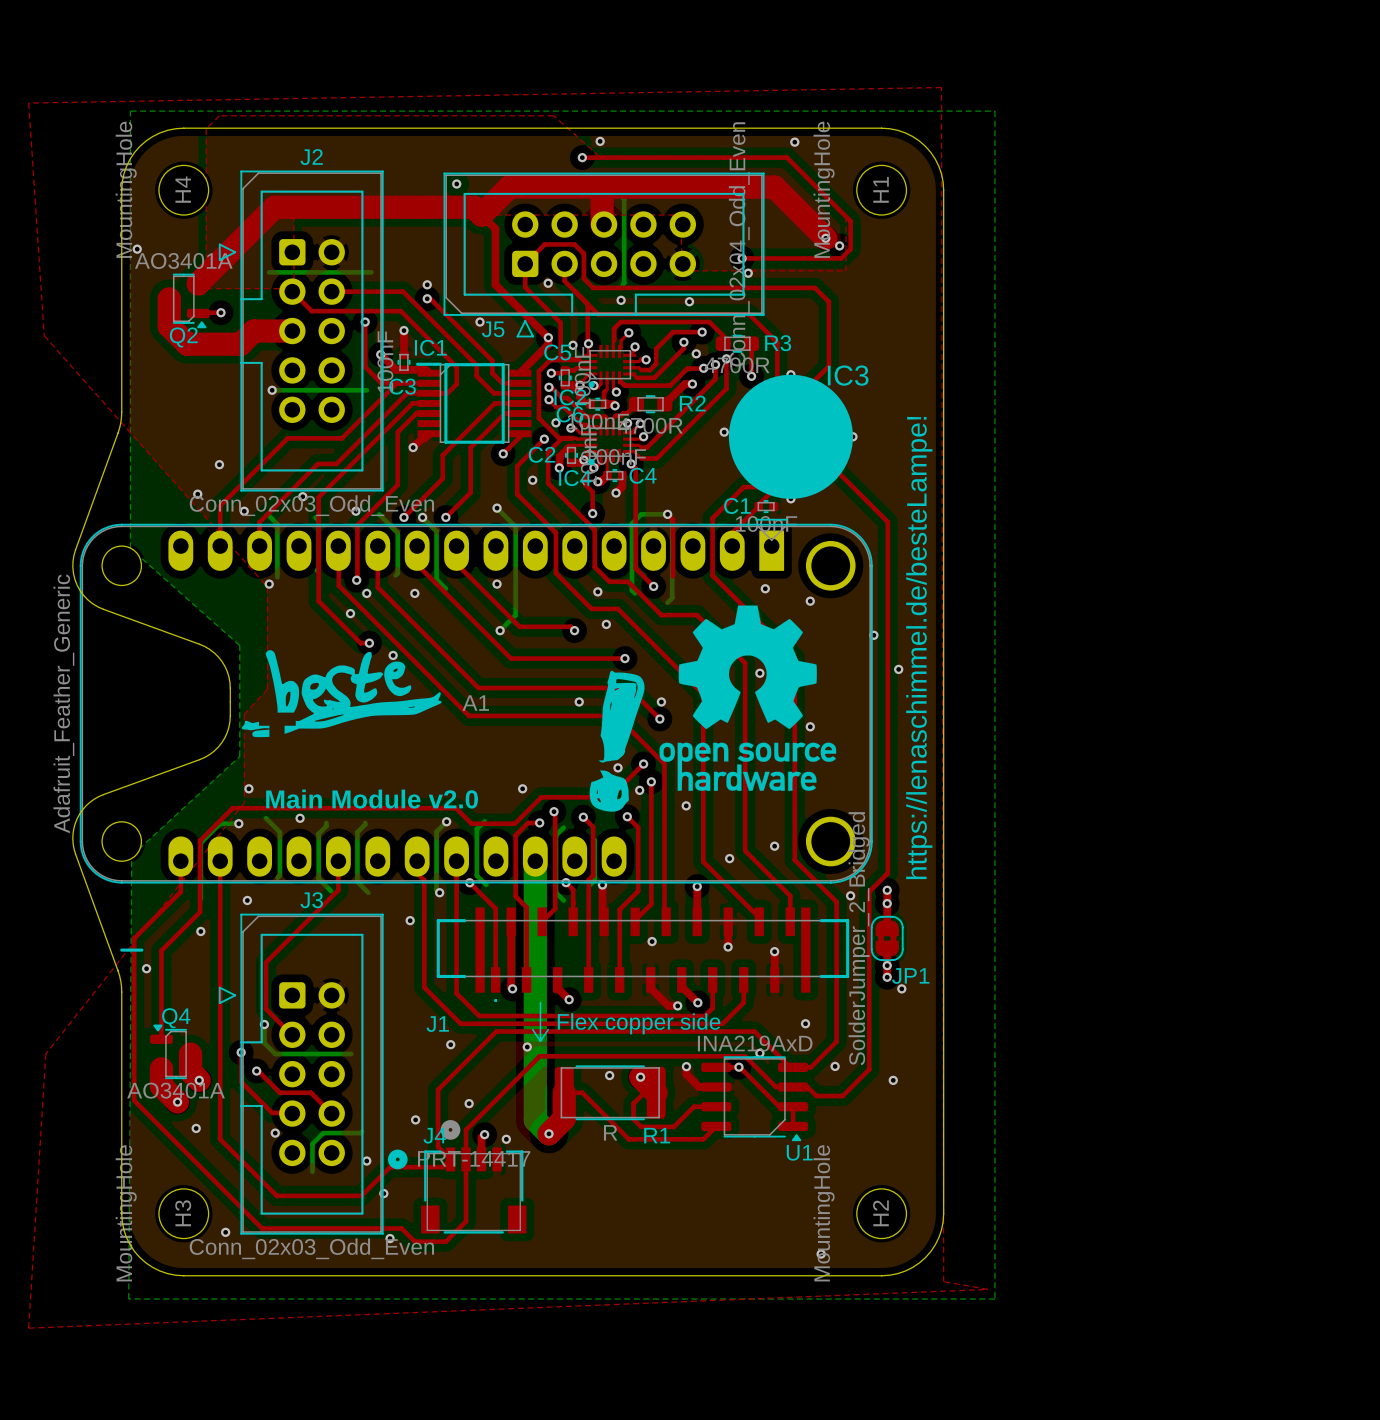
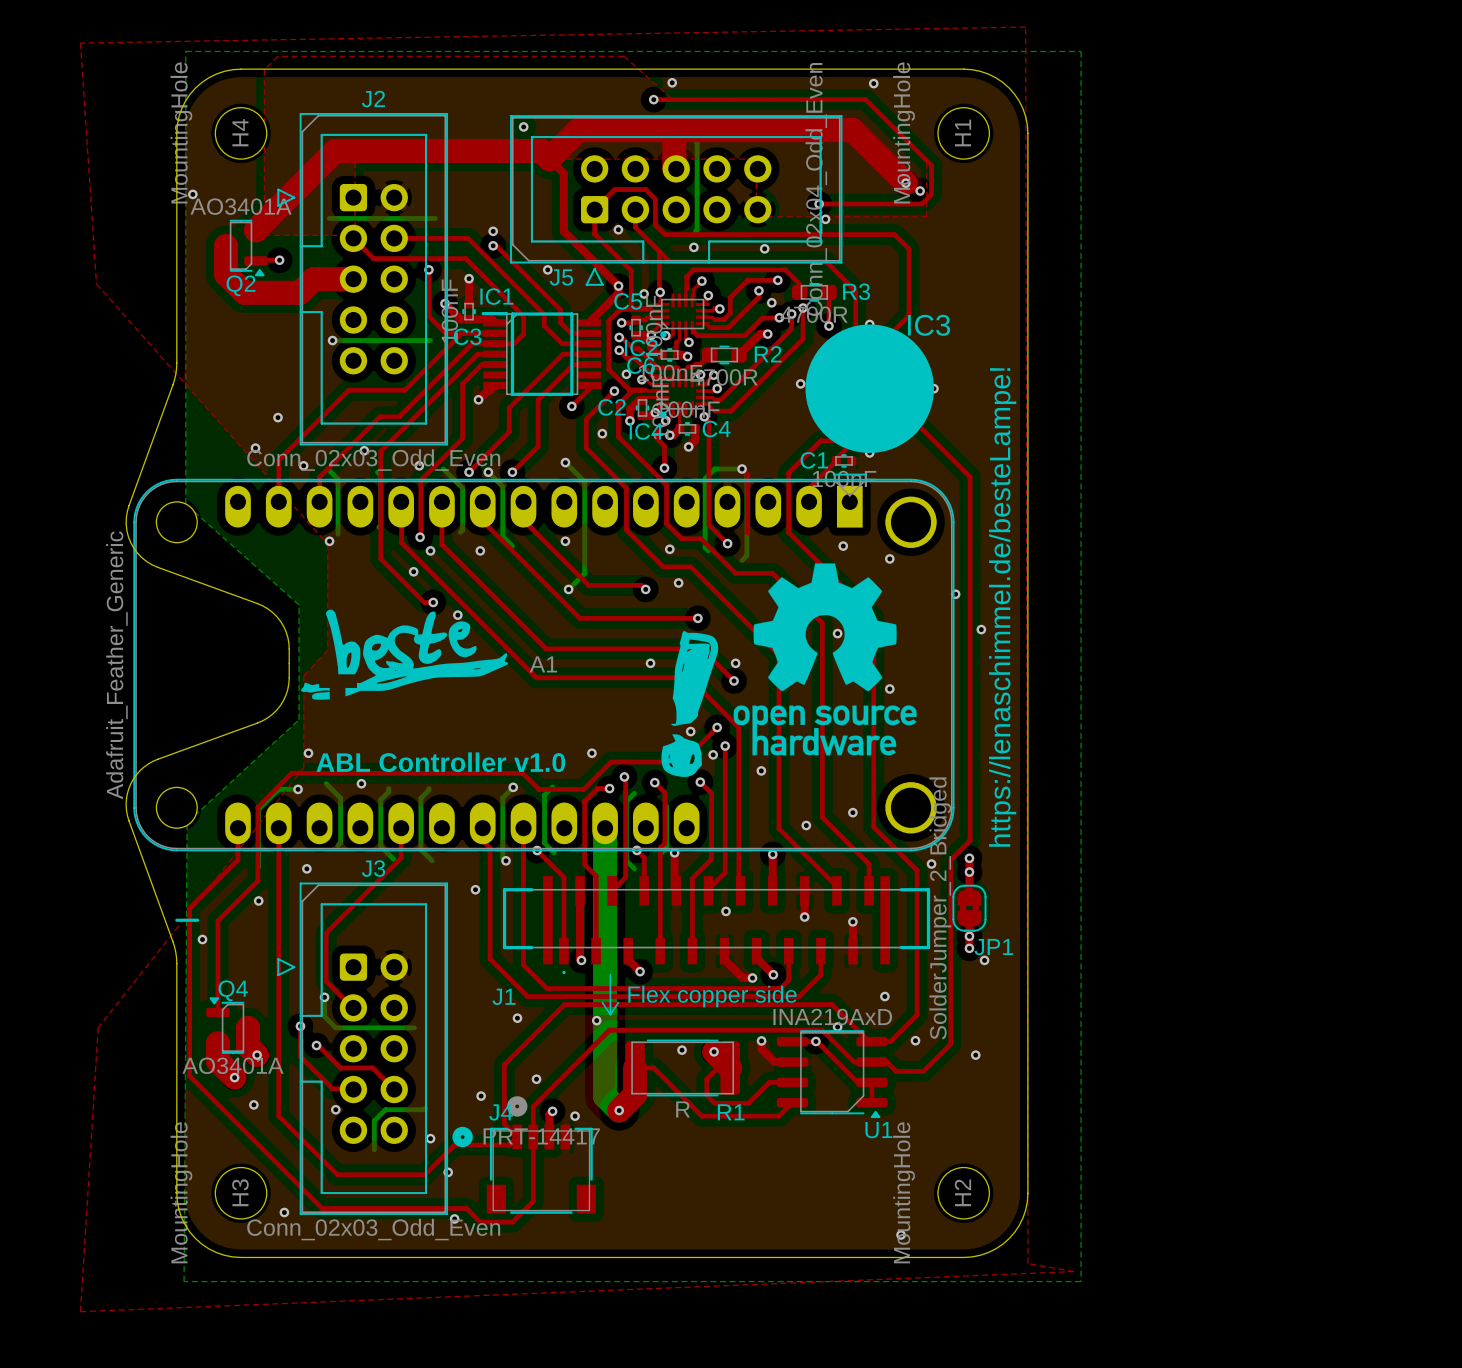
text: Main Module v2.0 (372, 799) -> ABL Controller v1.0 (440, 762)

